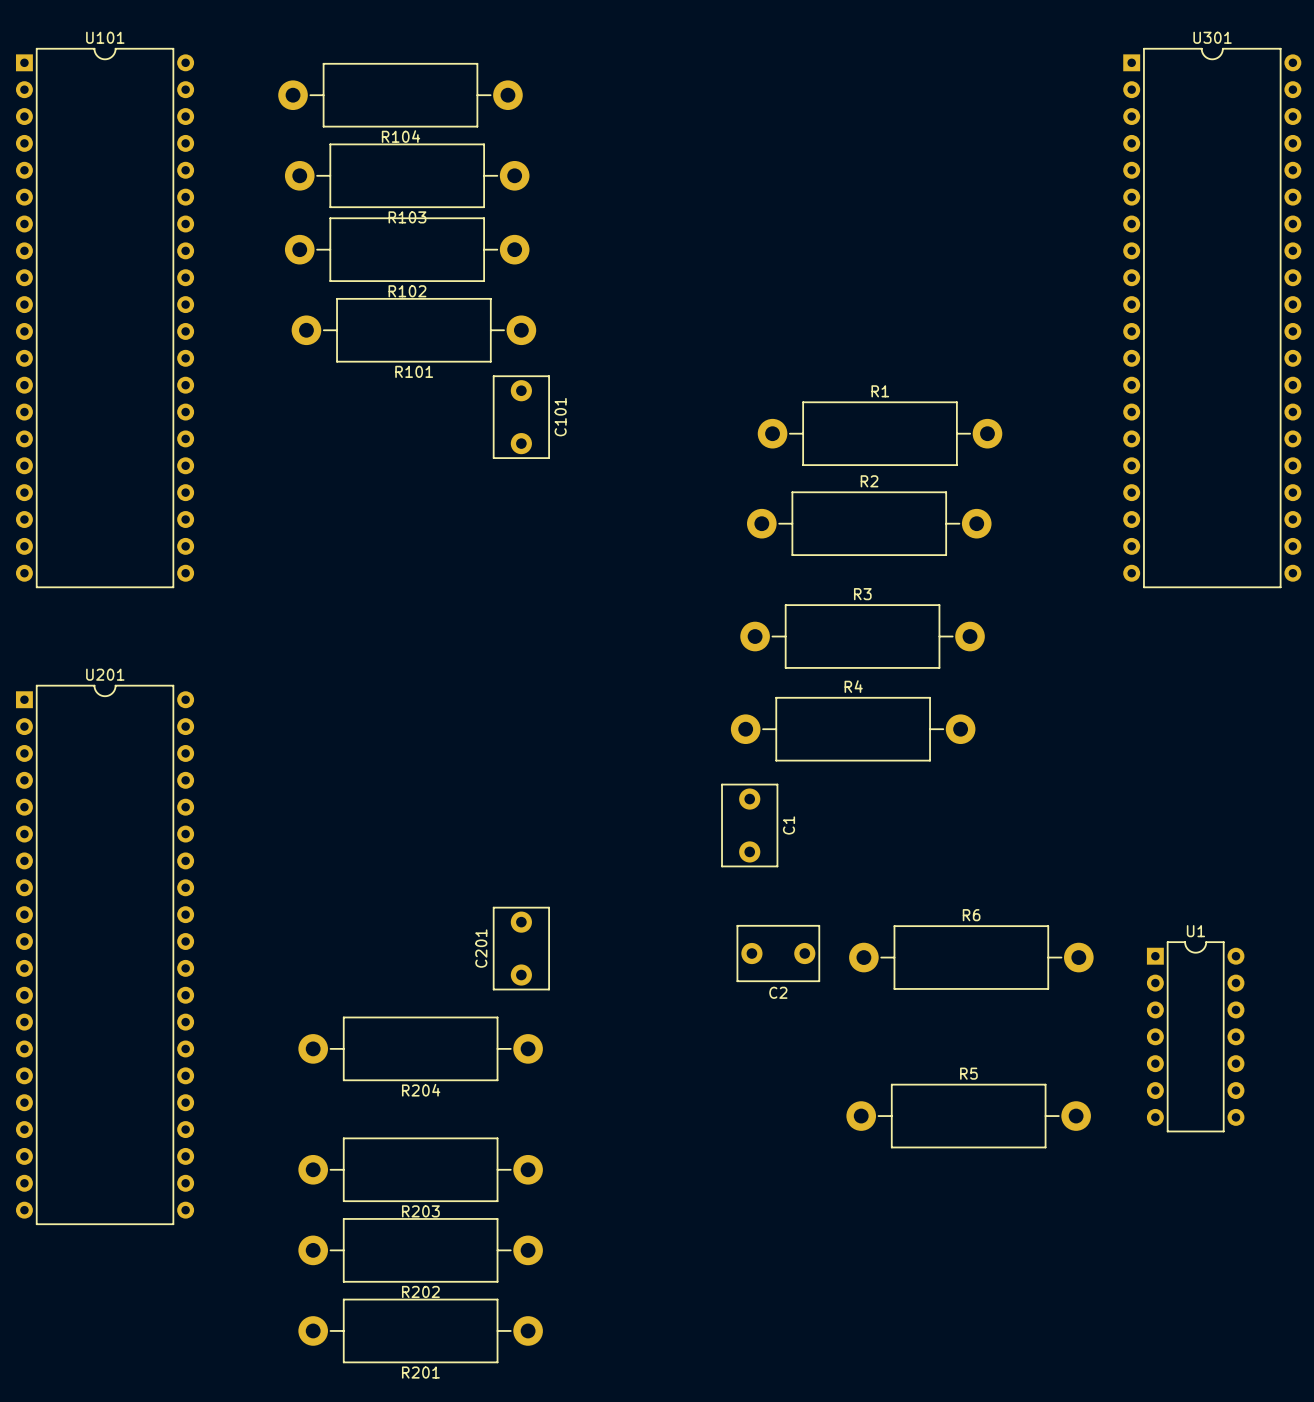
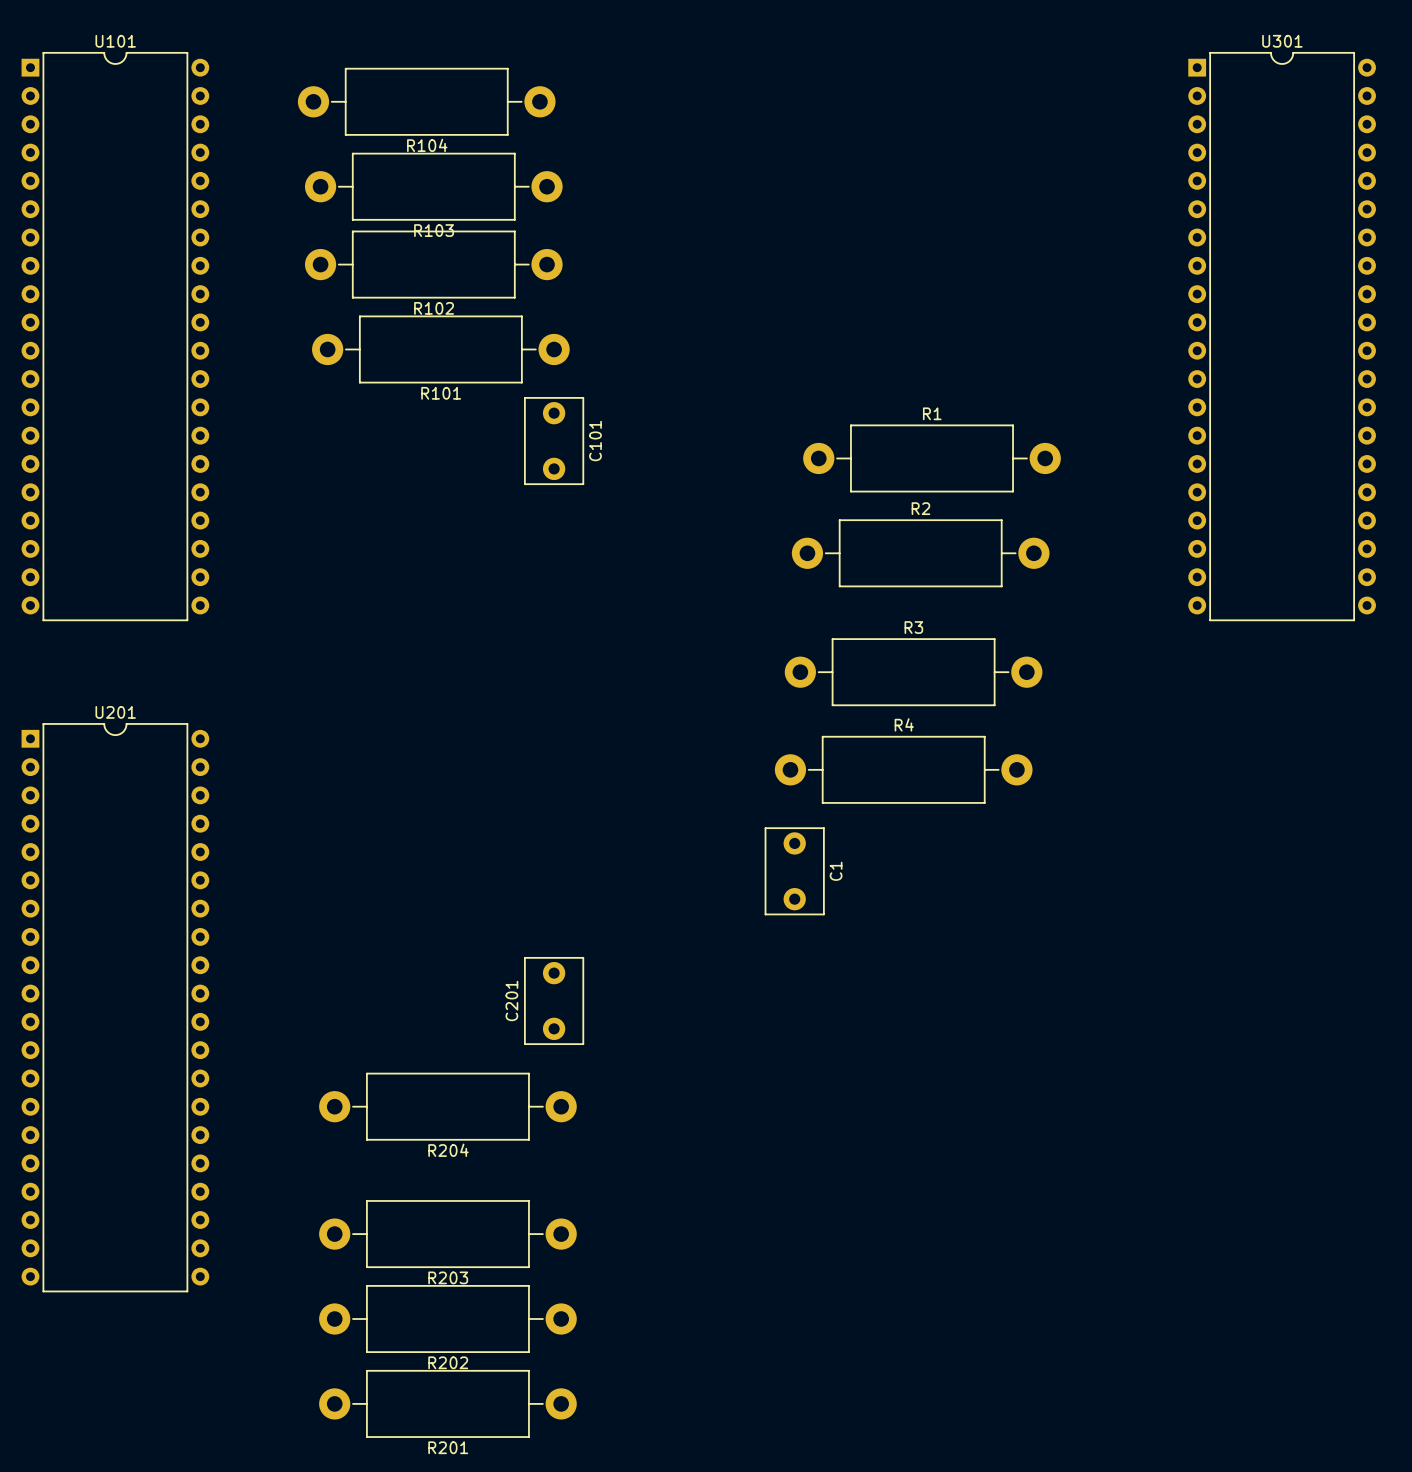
C2: (778, 953) -> none
R6: (971, 957) -> none
U1: (1195, 1036) -> none
R5: (968, 1116) -> none

